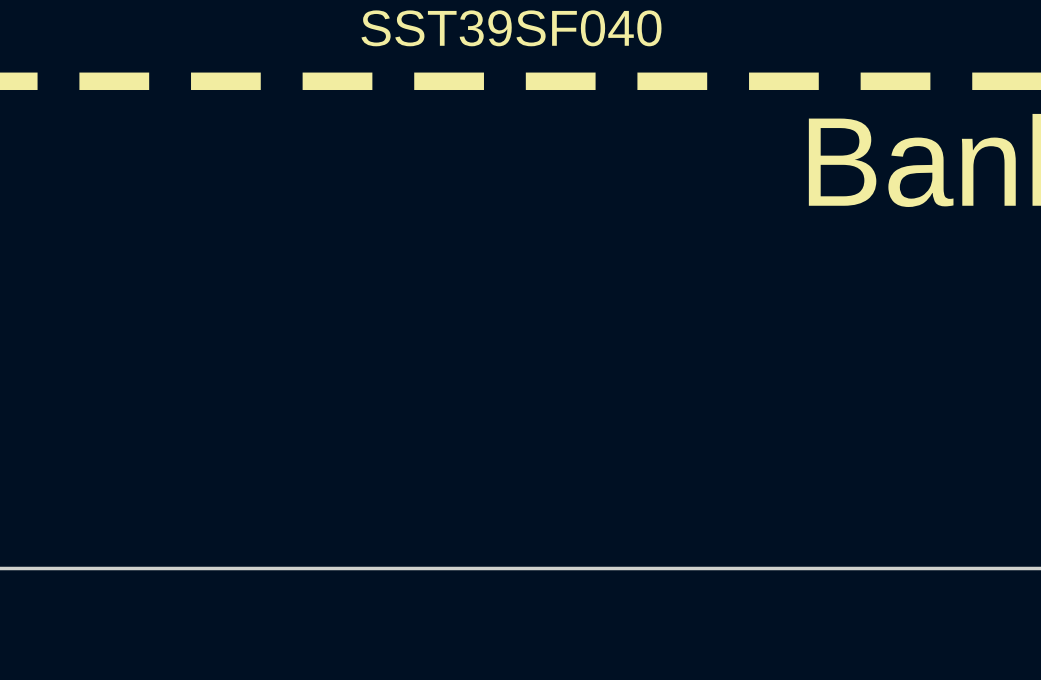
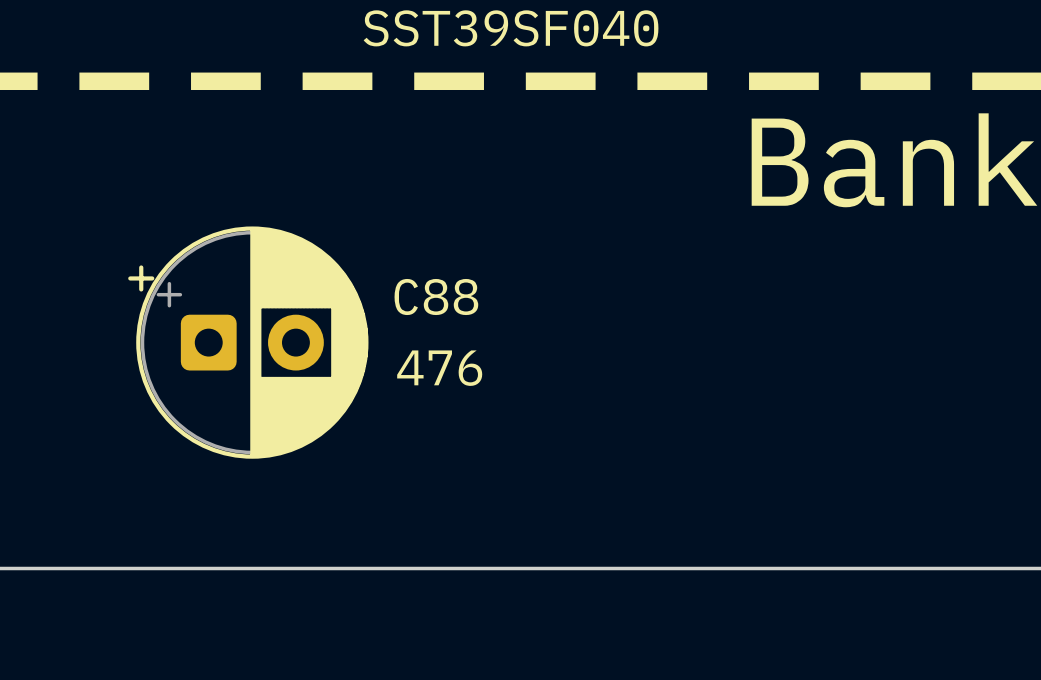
C88: none -> 476 (248, 342)

